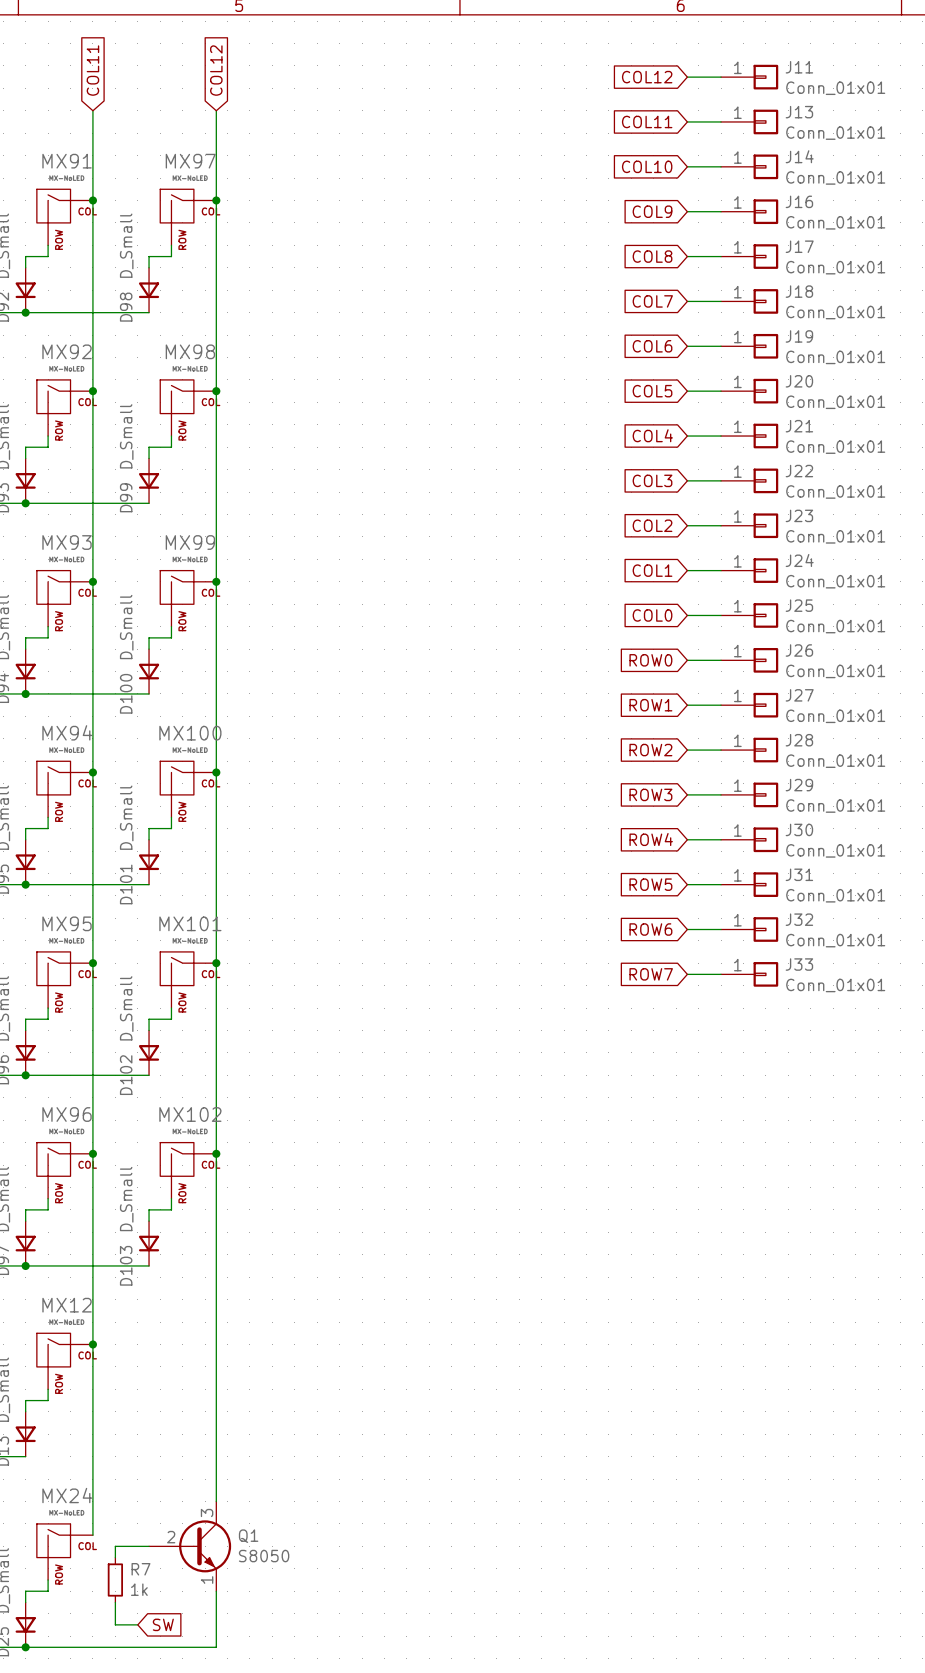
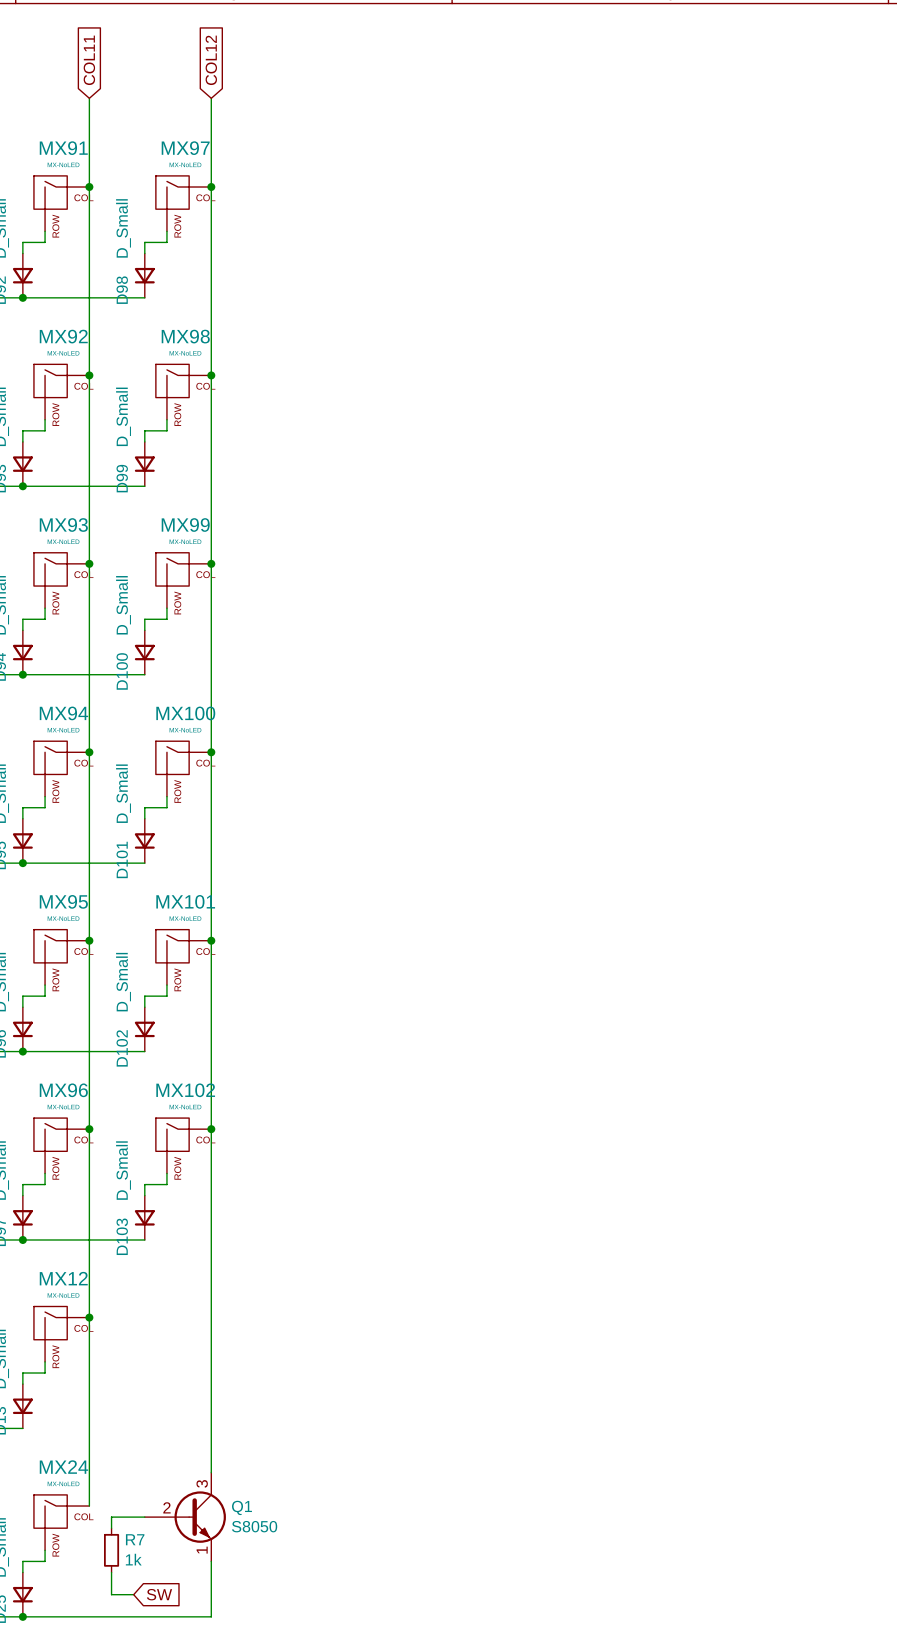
global label: COL12 (647, 77) -> none
wire: (687, 77) (721, 77) -> none
J11: Conn_01x01 (749, 77) -> none
global label: COL11 (647, 121) -> none
wire: (687, 121) (721, 121) -> none
J13: Conn_01x01 (749, 121) -> none
global label: COL10 (647, 166) -> none
wire: (687, 166) (721, 166) -> none
J14: Conn_01x01 (749, 166) -> none
global label: COL9 (652, 211) -> none
wire: (687, 211) (721, 211) -> none
J16: Conn_01x01 (749, 211) -> none
global label: COL8 (652, 256) -> none
wire: (687, 256) (721, 256) -> none
J17: Conn_01x01 (749, 256) -> none
global label: COL7 (652, 301) -> none
wire: (687, 301) (721, 301) -> none
J18: Conn_01x01 (749, 301) -> none
global label: COL6 (652, 346) -> none
wire: (687, 346) (721, 346) -> none
J19: Conn_01x01 (749, 346) -> none
global label: COL5 (652, 391) -> none
wire: (687, 391) (721, 391) -> none
J20: Conn_01x01 (749, 391) -> none
global label: COL4 (652, 435) -> none
wire: (687, 436) (721, 436) -> none
J21: Conn_01x01 (749, 436) -> none
global label: COL3 (652, 480) -> none
wire: (687, 480) (721, 480) -> none
J22: Conn_01x01 (749, 480) -> none
global label: COL2 (652, 525) -> none
wire: (687, 525) (721, 525) -> none
J23: Conn_01x01 (749, 525) -> none
global label: COL1 (652, 570) -> none
wire: (687, 570) (721, 570) -> none
J24: Conn_01x01 (749, 570) -> none
global label: COL0 (652, 615) -> none
wire: (687, 615) (721, 615) -> none
J25: Conn_01x01 (749, 615) -> none
global label: ROW0 (650, 660) -> none
wire: (687, 660) (721, 660) -> none
J26: Conn_01x01 (749, 660) -> none
global label: ROW1 (650, 705) -> none
wire: (687, 705) (721, 705) -> none
J27: Conn_01x01 (749, 705) -> none
global label: ROW2 (650, 750) -> none
wire: (687, 750) (721, 750) -> none
J28: Conn_01x01 (749, 750) -> none
global label: ROW3 (650, 794) -> none
wire: (687, 794) (721, 794) -> none
J29: Conn_01x01 (749, 794) -> none
global label: ROW4 (651, 839) -> none
wire: (687, 839) (721, 839) -> none
J30: Conn_01x01 (749, 839) -> none
global label: ROW5 (650, 884) -> none
wire: (687, 884) (721, 884) -> none
J31: Conn_01x01 (749, 884) -> none
global label: ROW6 (650, 929) -> none
wire: (687, 929) (721, 929) -> none
J32: Conn_01x01 (749, 929) -> none
global label: ROW7 (651, 974) -> none
wire: (687, 974) (721, 974) -> none
J33: Conn_01x01 (749, 974) -> none

